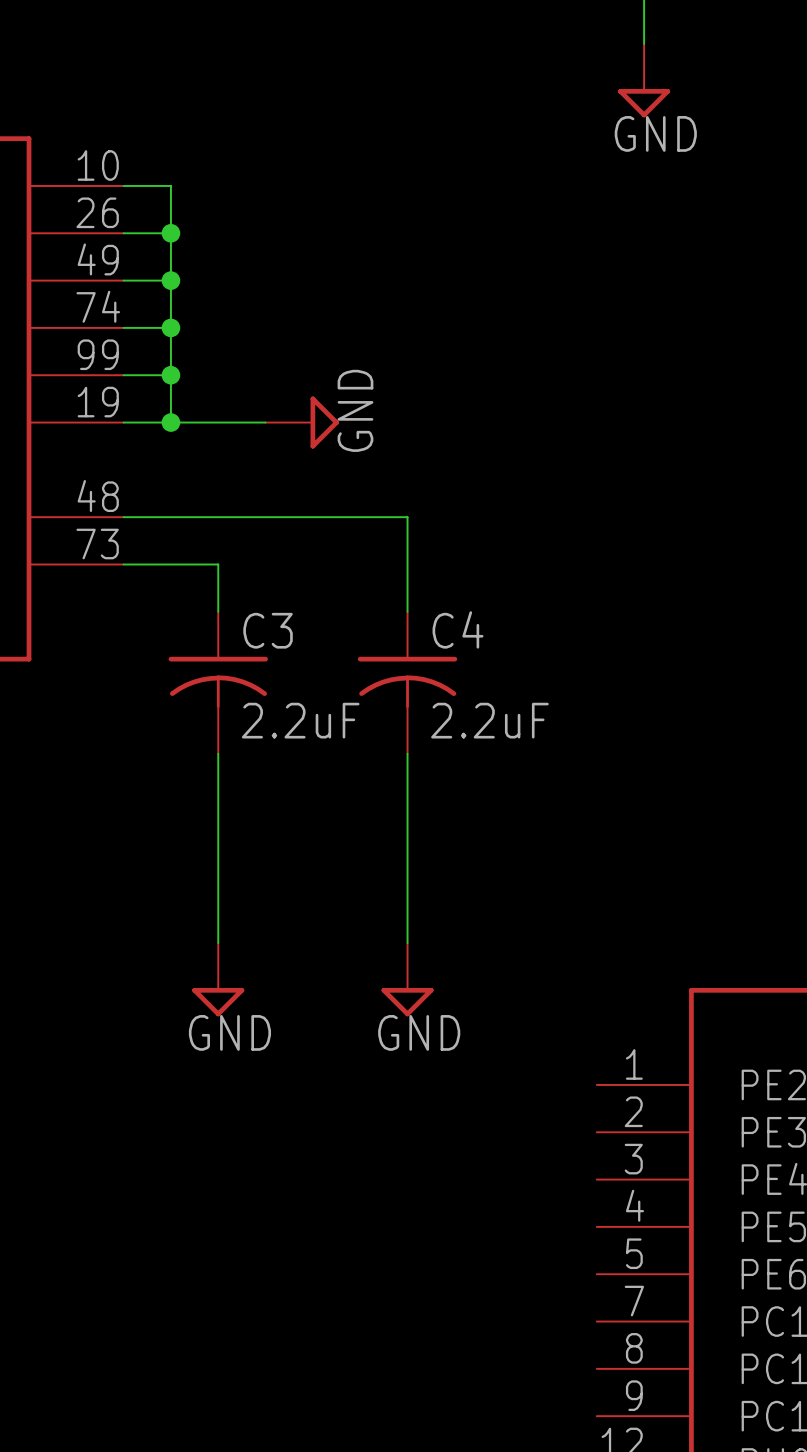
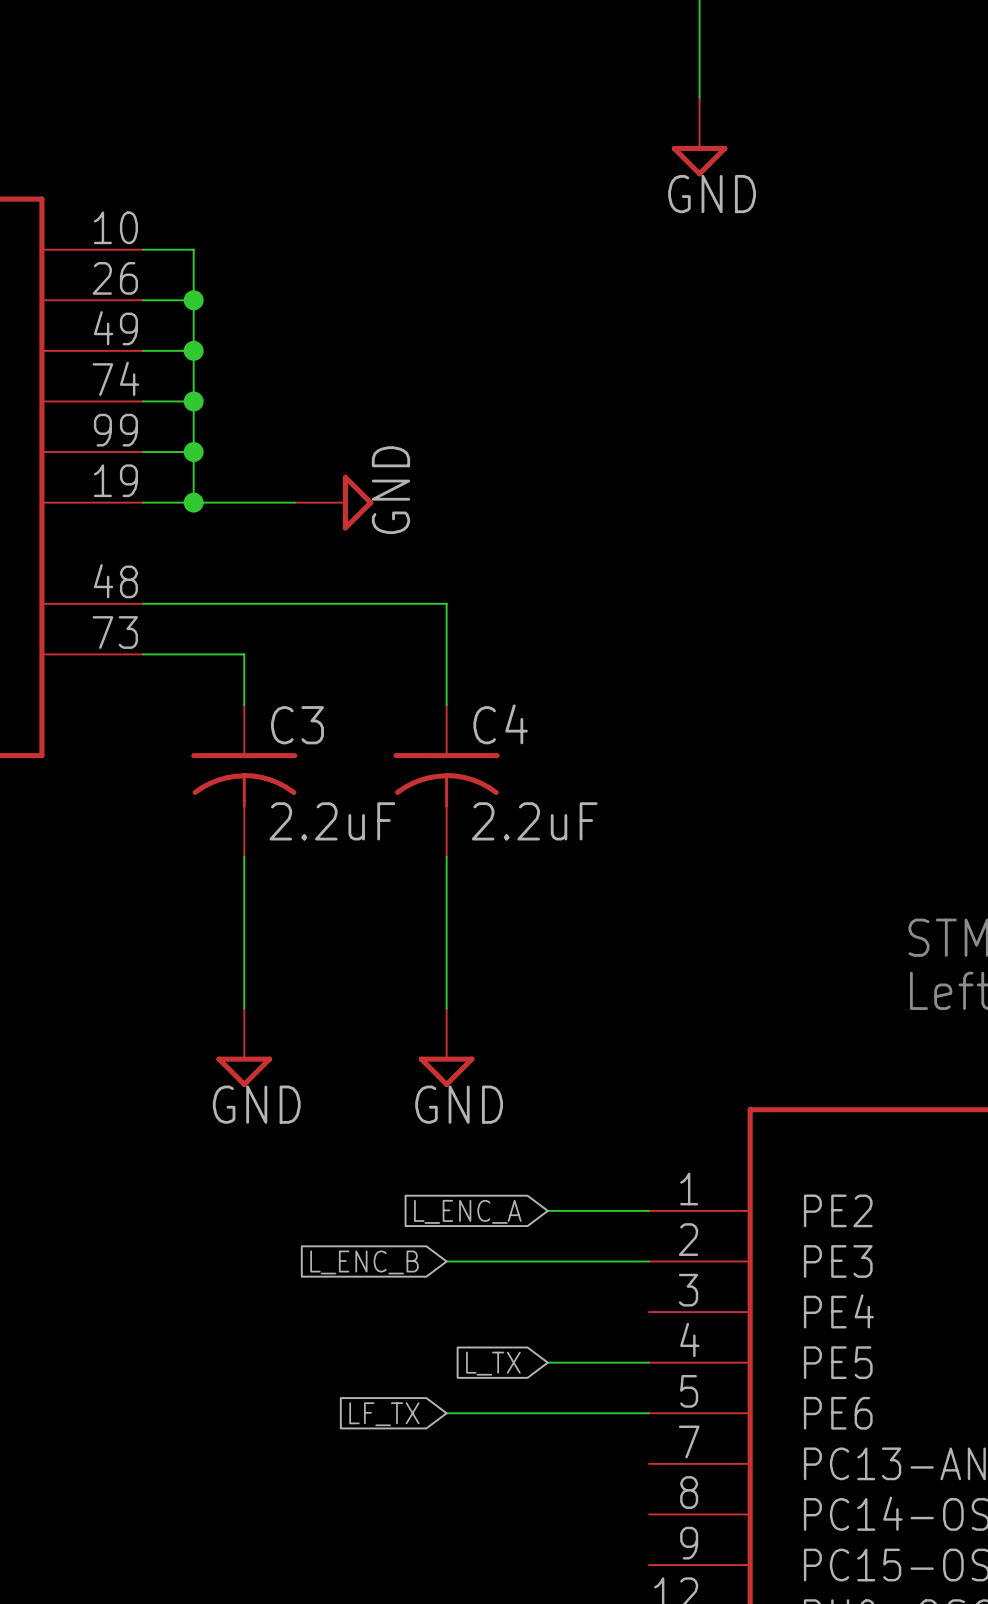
power symbol position: GND (218, 979) -> GND (244, 1047)
power symbol position: GND (407, 979) -> GND (446, 1047)
wire: none -> (547, 1210) (648, 1210)
global label: none -> L_ENC_A (467, 1211)
wire: none -> (446, 1261) (648, 1261)
global label: none -> L_ENC_B (364, 1262)
wire: none -> (547, 1362) (648, 1362)
global label: none -> L_TX (493, 1363)
wire: none -> (446, 1413) (648, 1413)
global label: none -> LF_TX (384, 1414)

